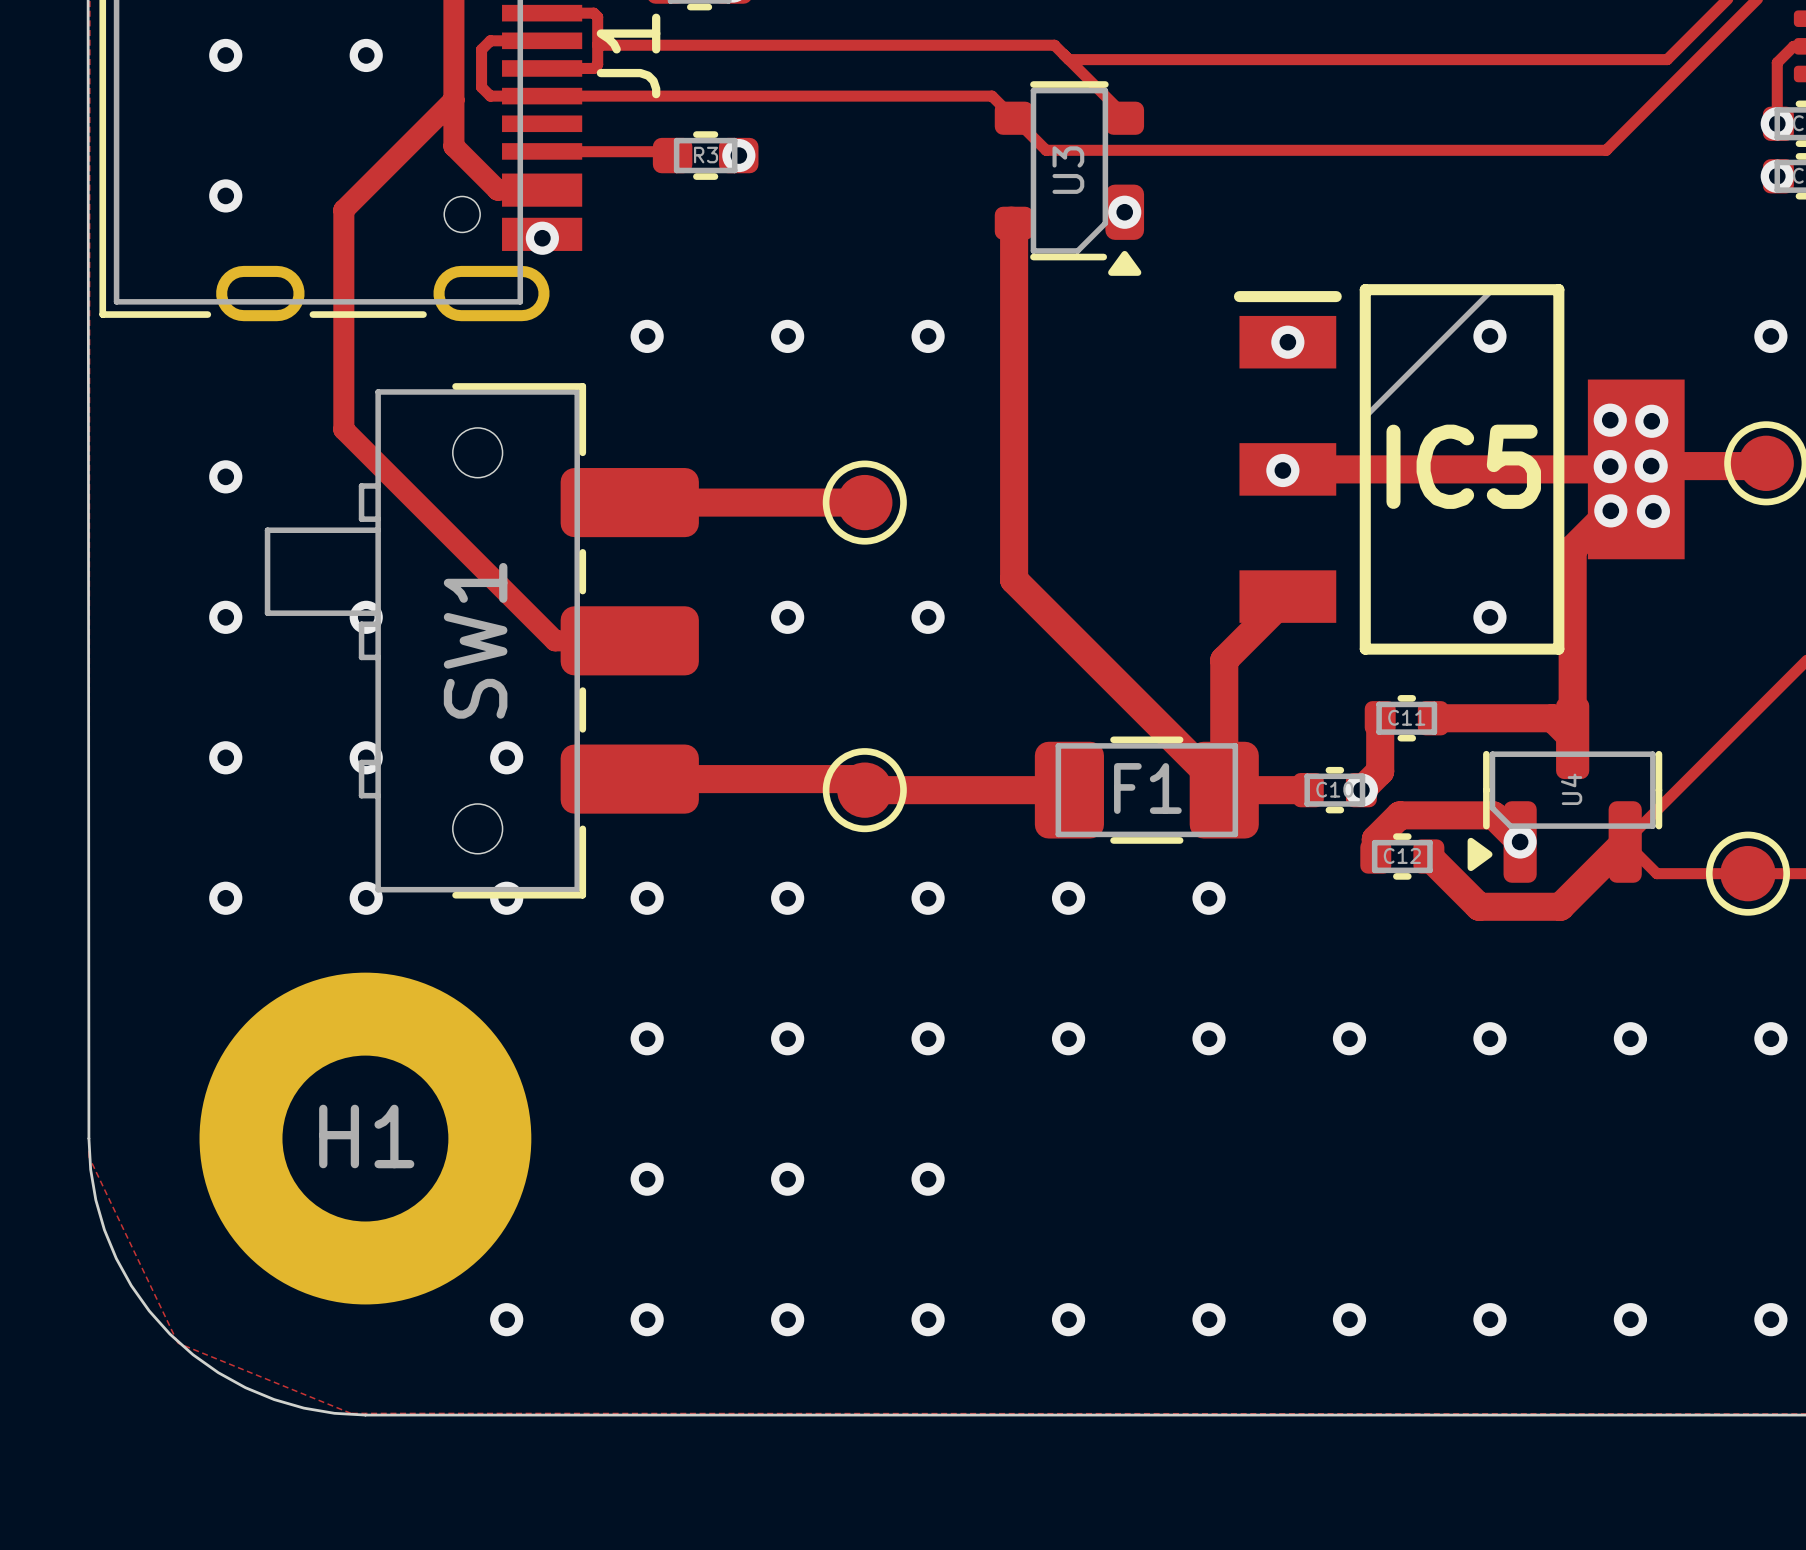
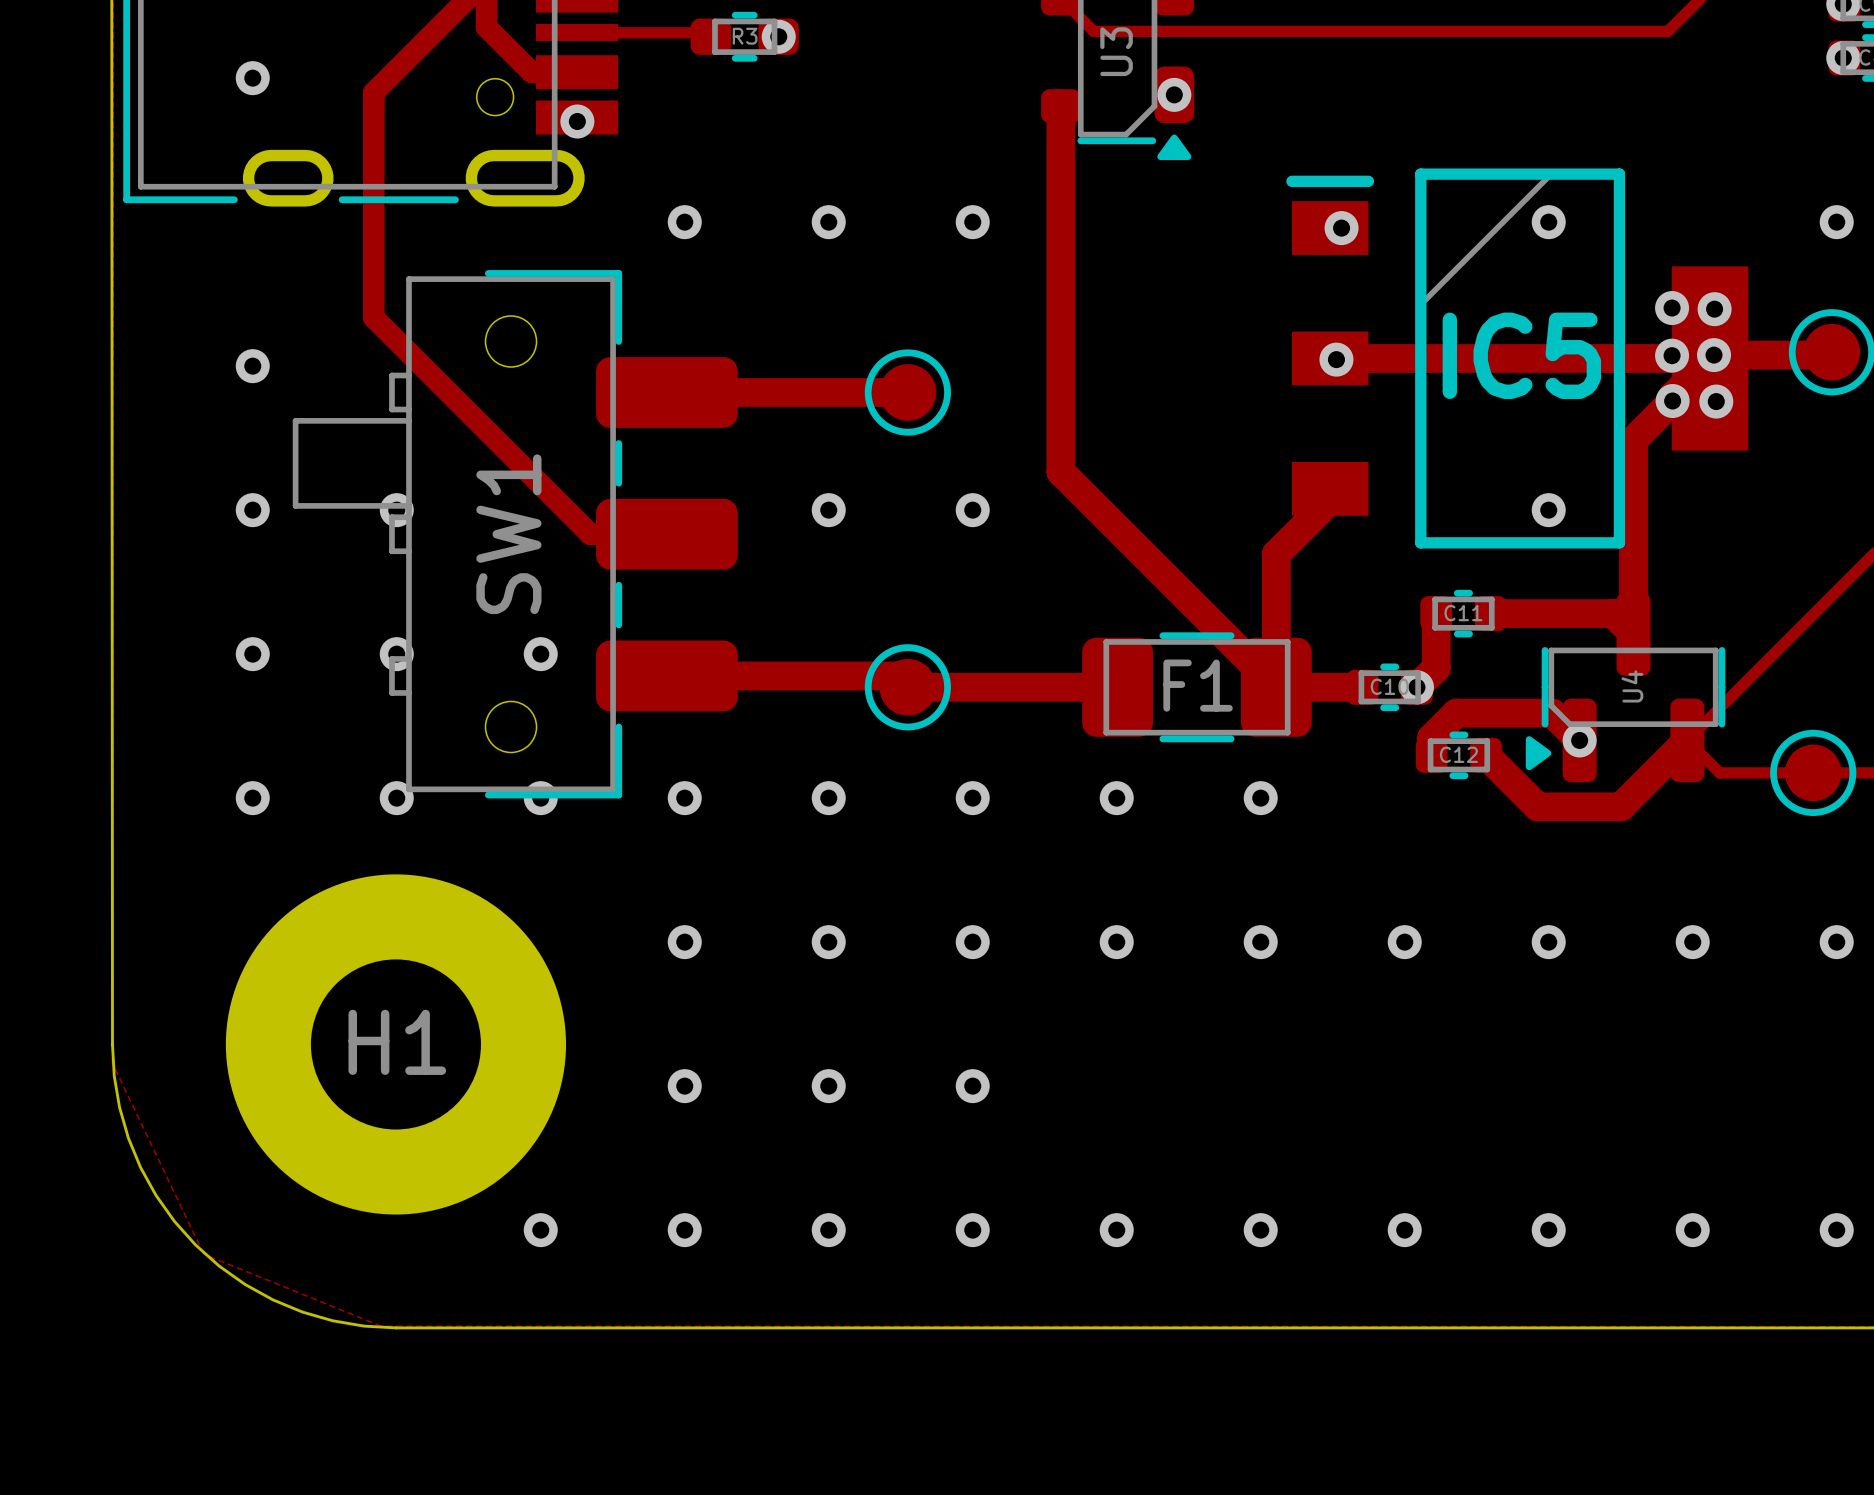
IC5 footprint: [1233, 284, 1685, 655] -> [1286, 168, 1749, 549]

